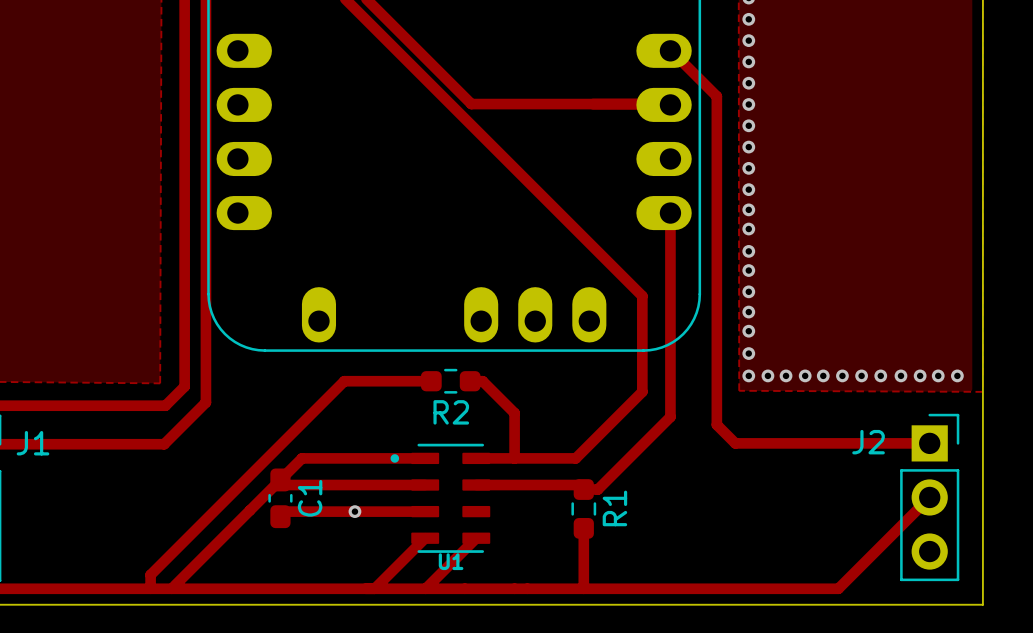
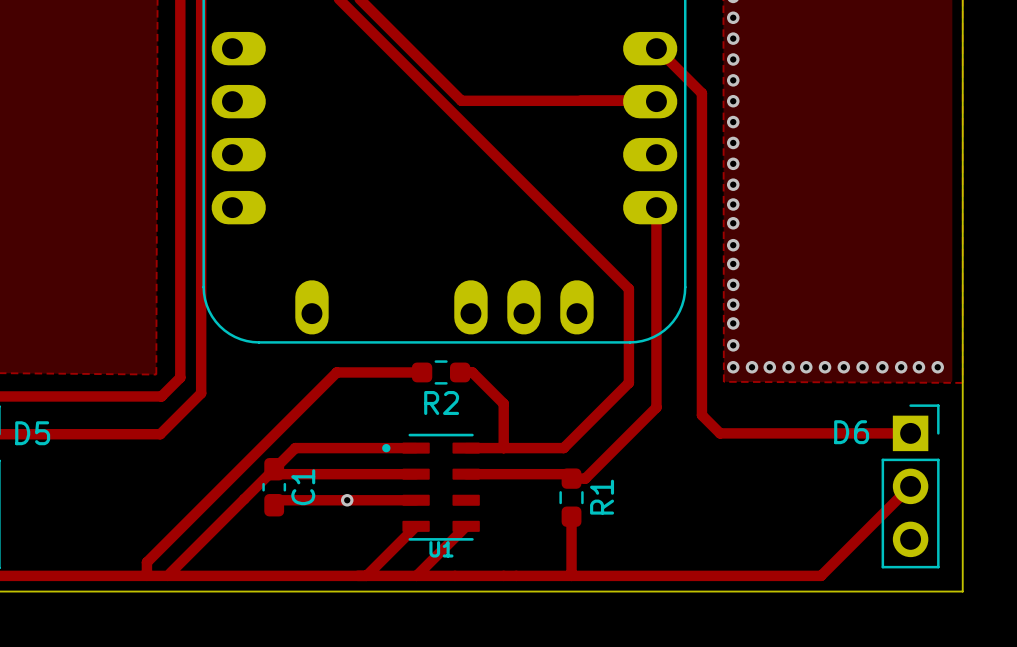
J2 name: J2 (868, 442) -> D6 (851, 432)
J1 name: J1 (33, 443) -> D5 (32, 433)

